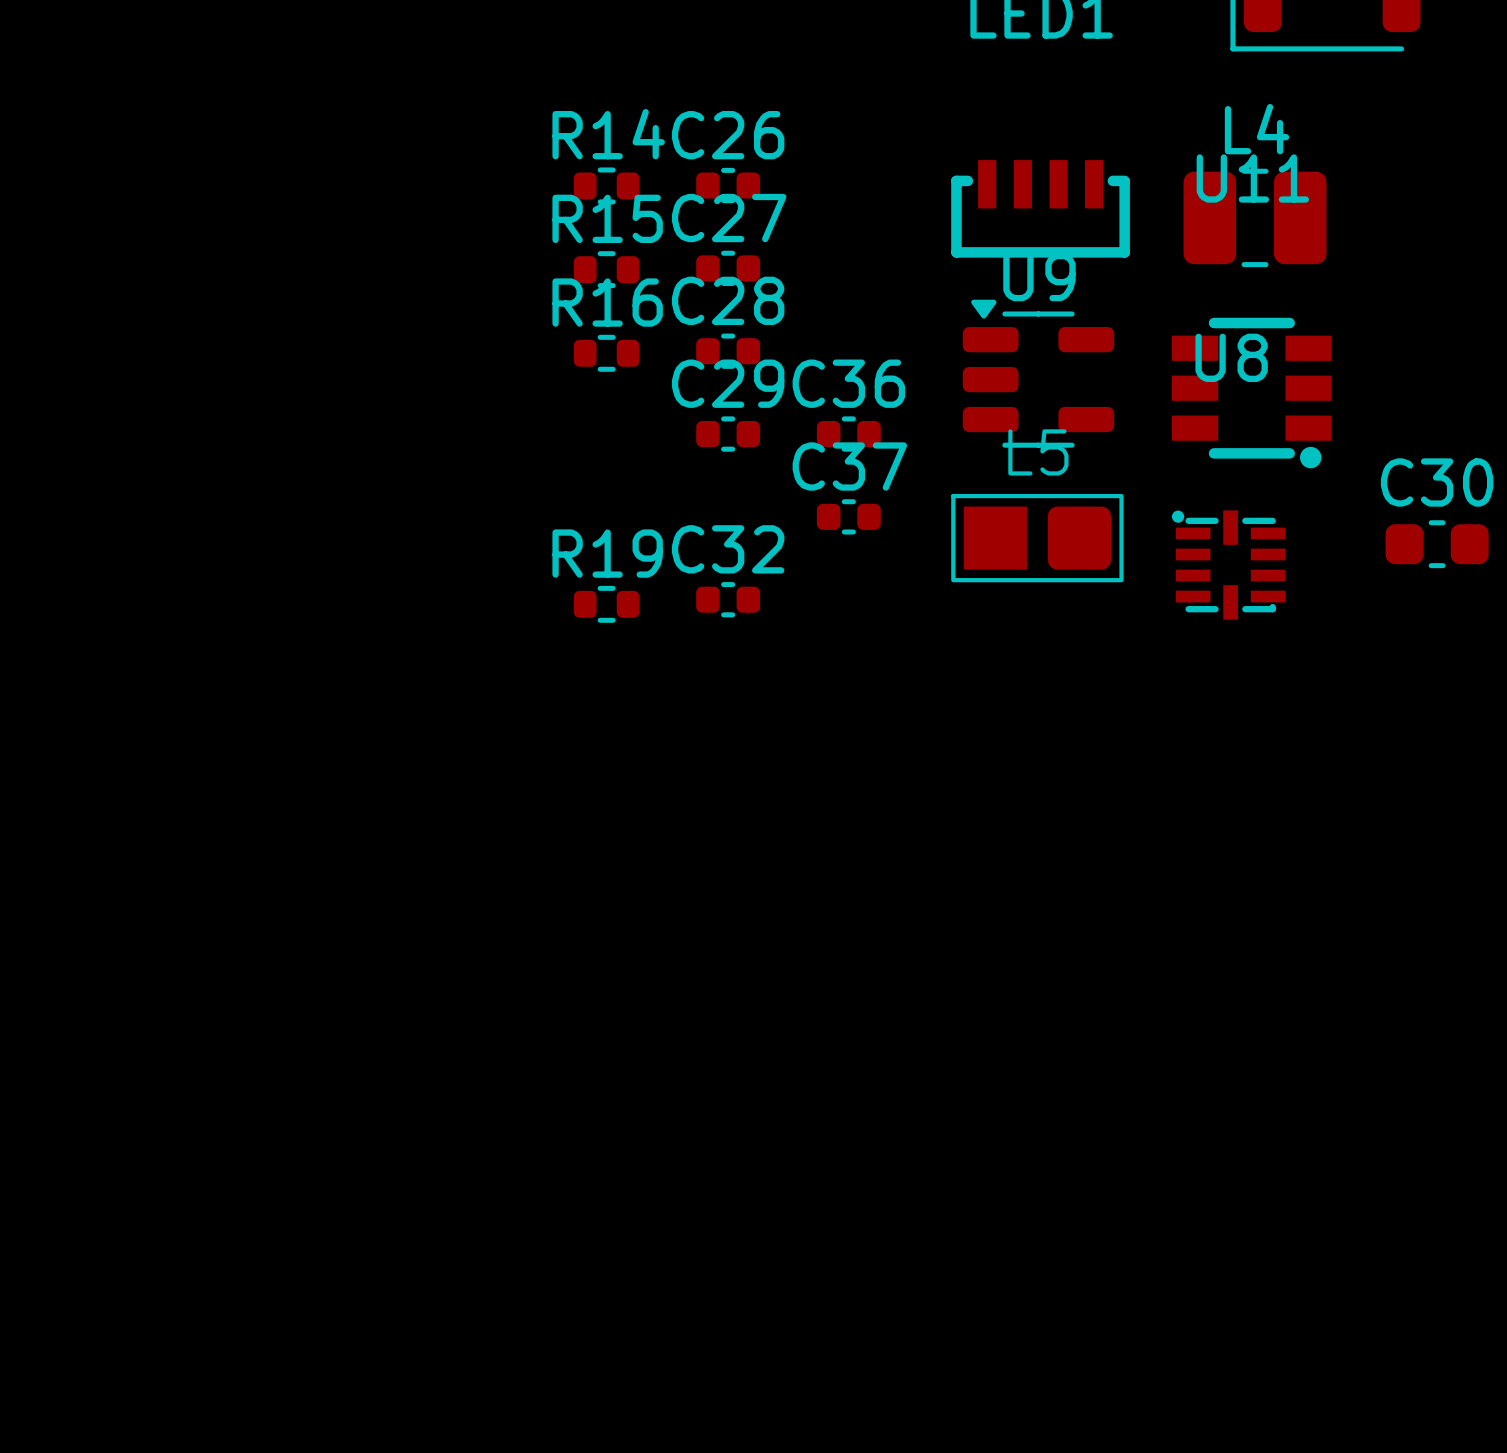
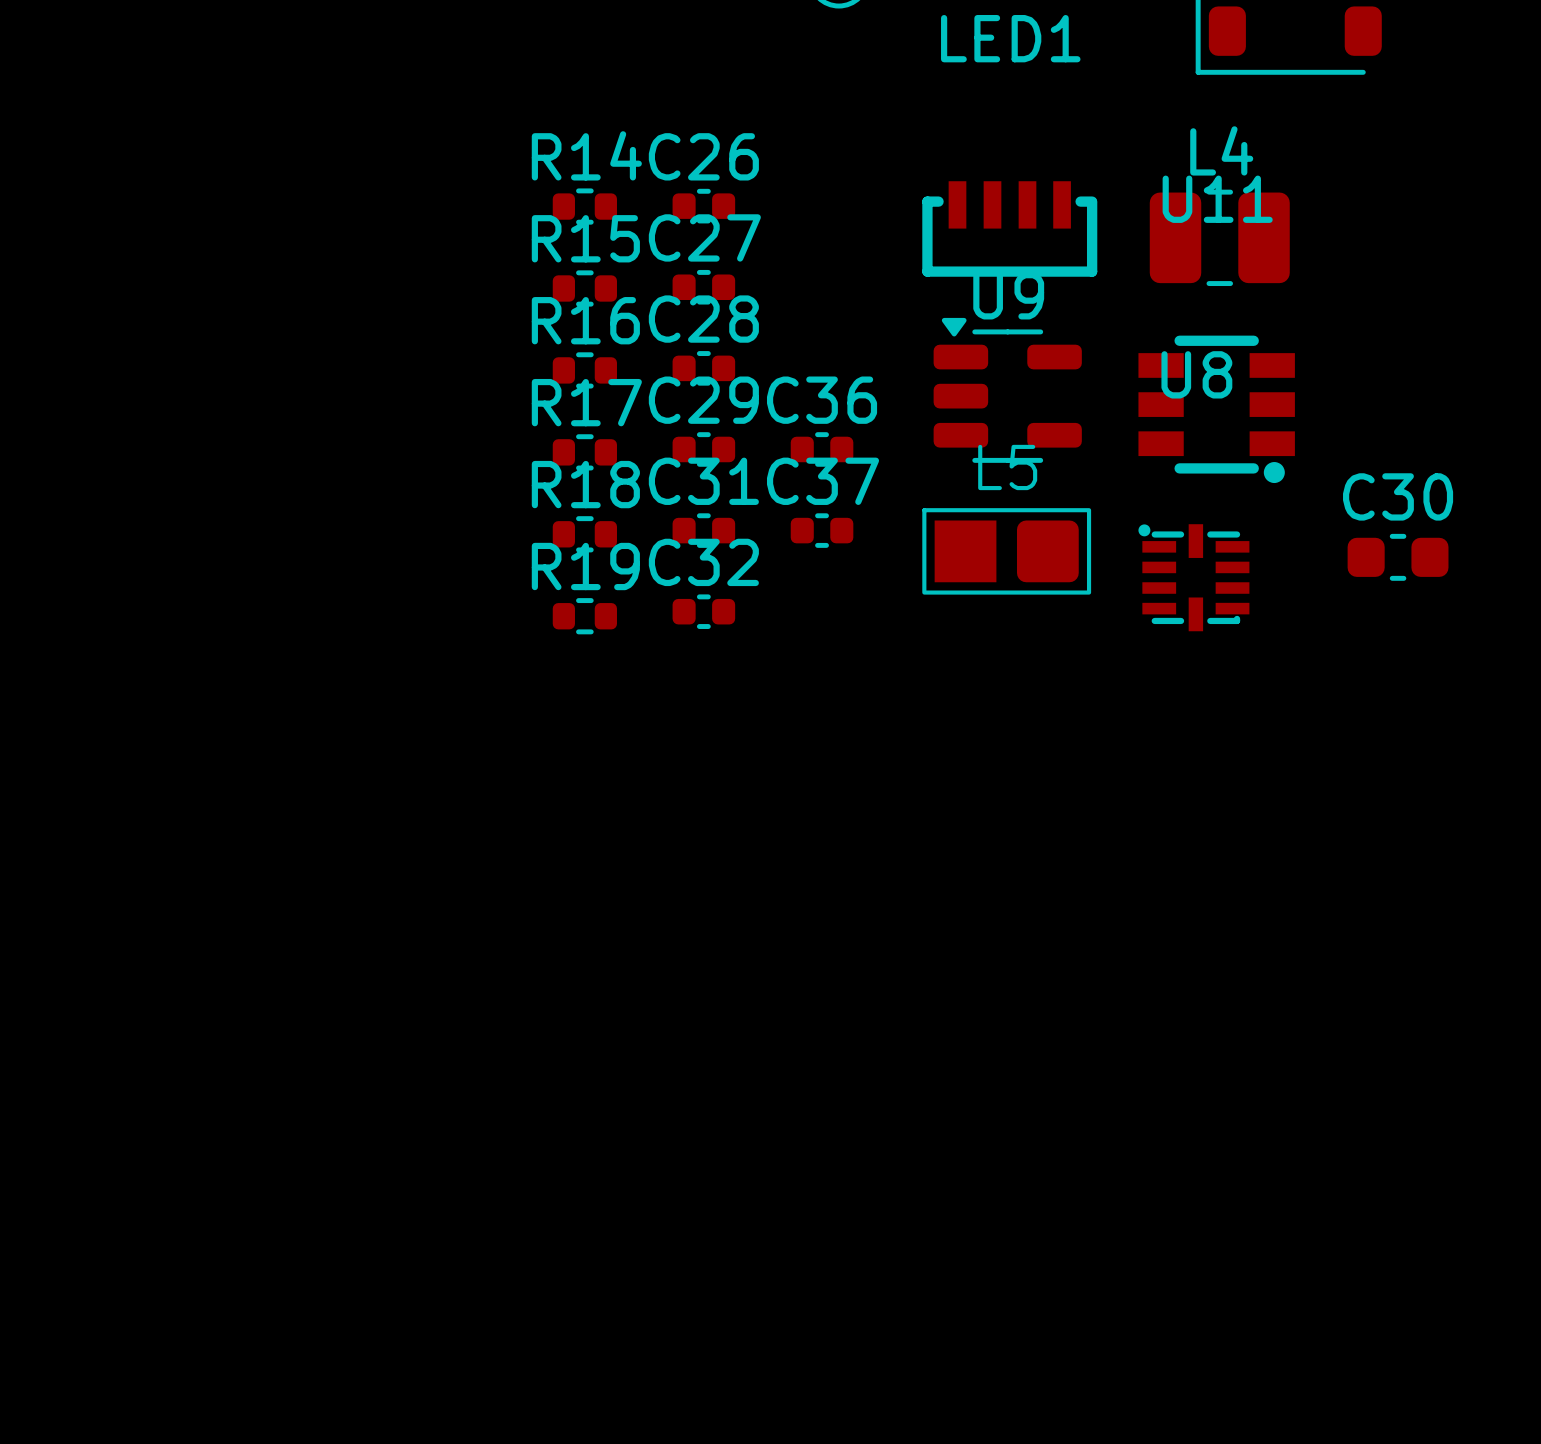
R17: none -> (584, 452)
C31: none -> (703, 530)
R18: none -> (584, 534)

